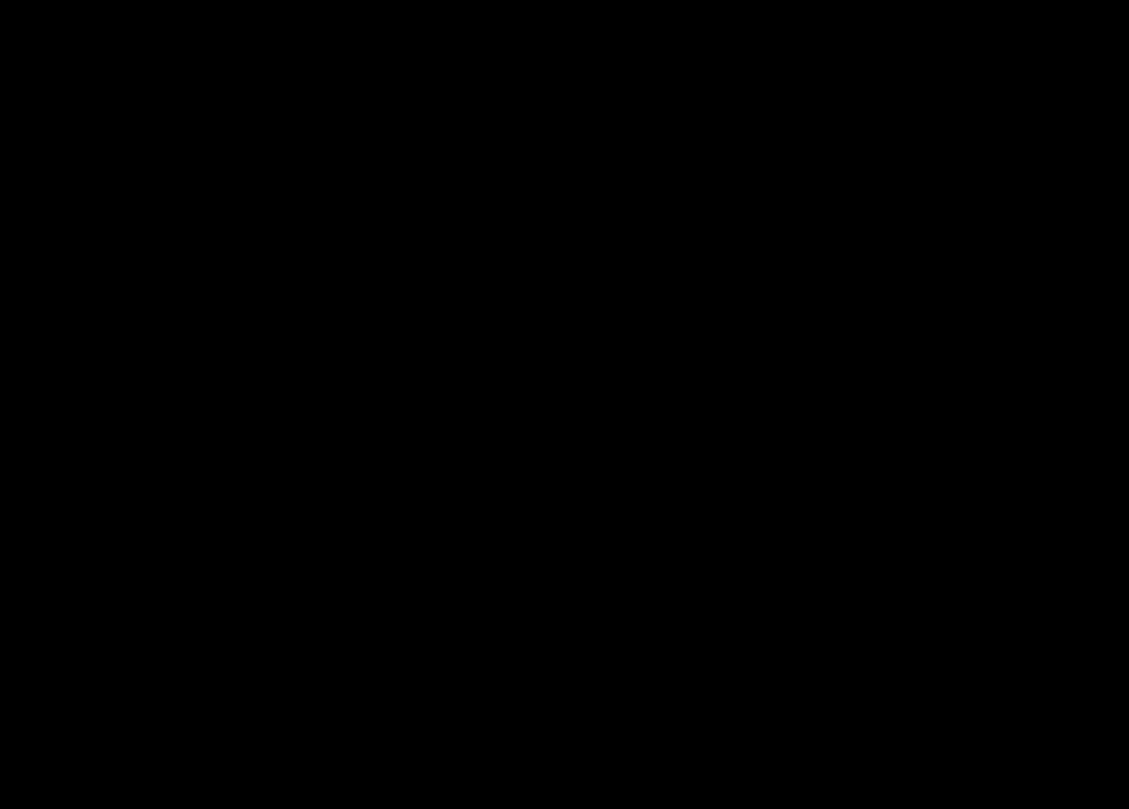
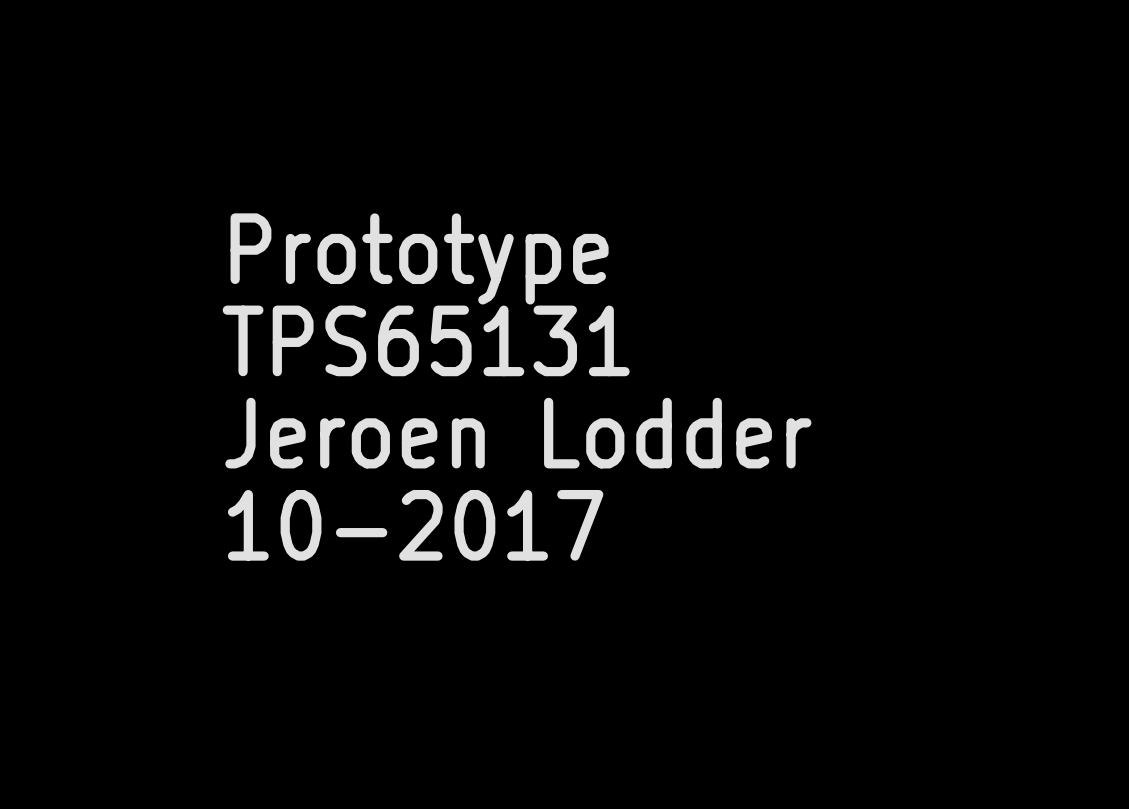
text: none -> Prototype (419, 258)
text: none -> TPS65131 (426, 340)
text: none -> Jeroen Lodder (518, 433)
text: none -> 10-2017 (415, 525)

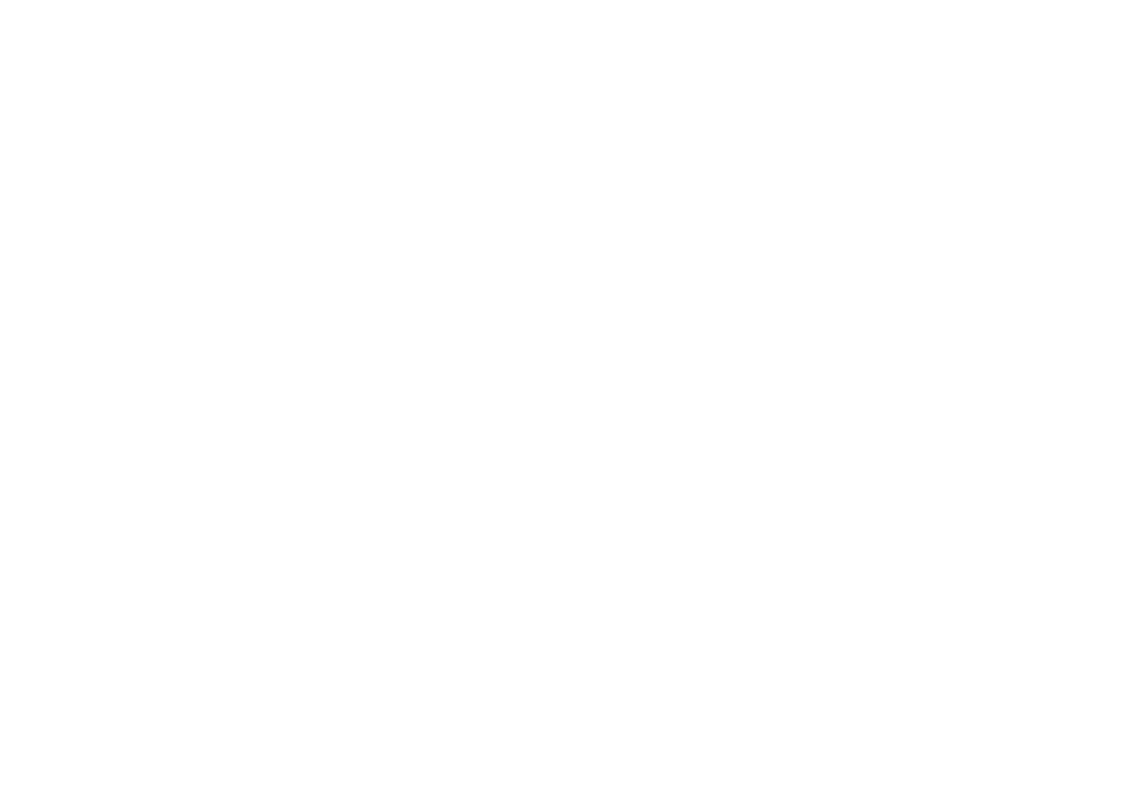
text: Prototype (419, 258) -> none
text: TPS65131 (426, 340) -> none
text: Jeroen Lodder (518, 433) -> none
text: 10-2017 (415, 525) -> none

